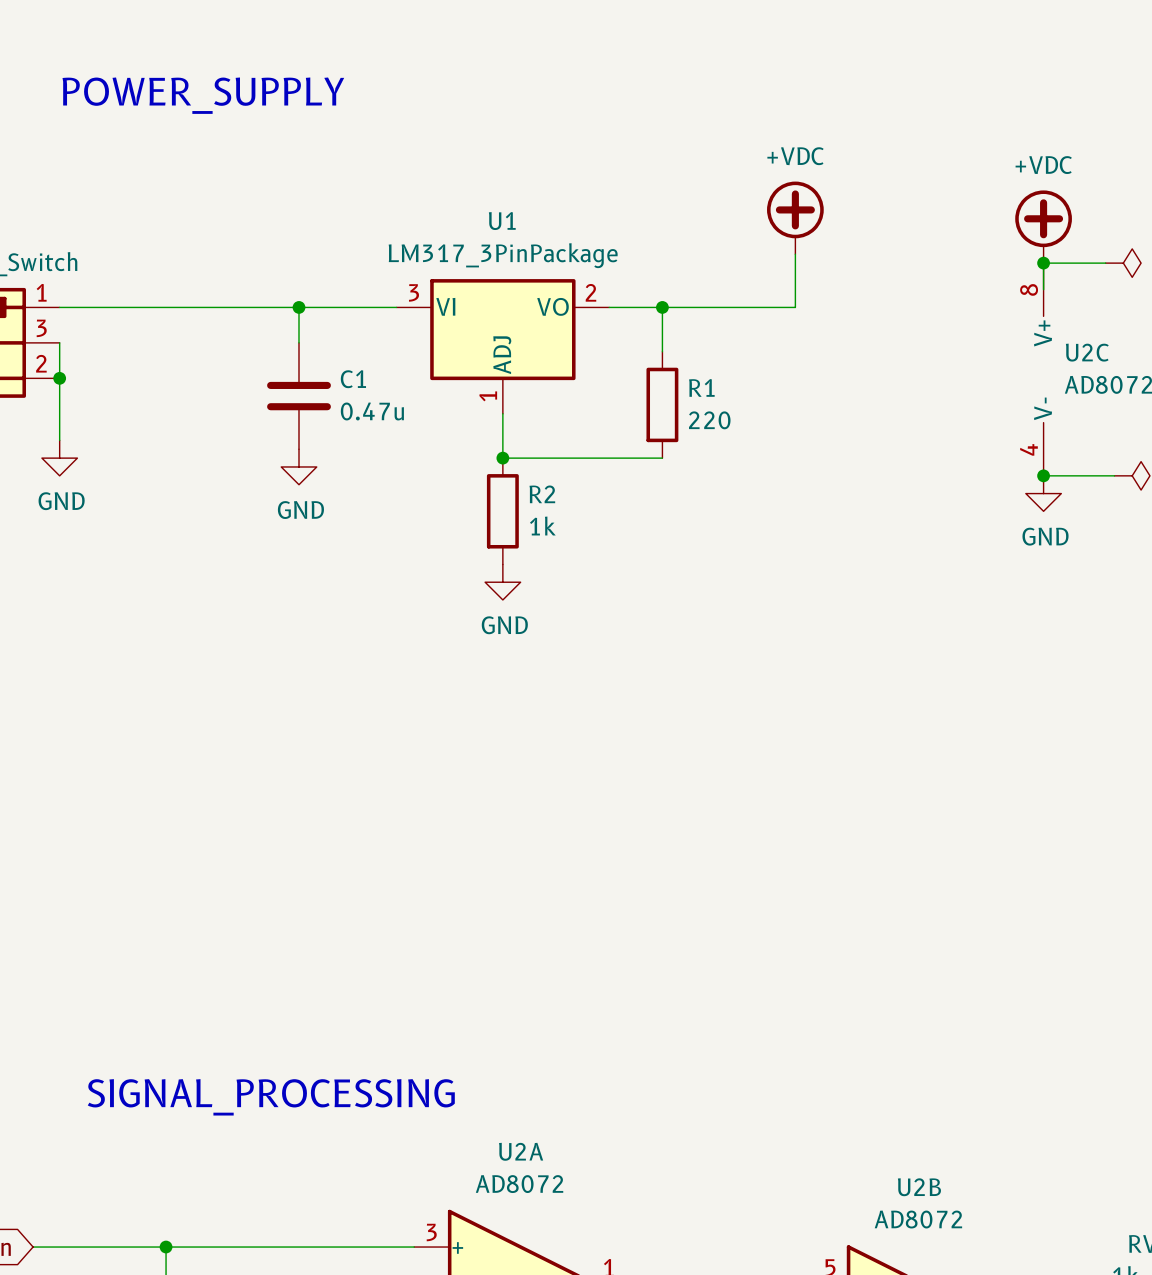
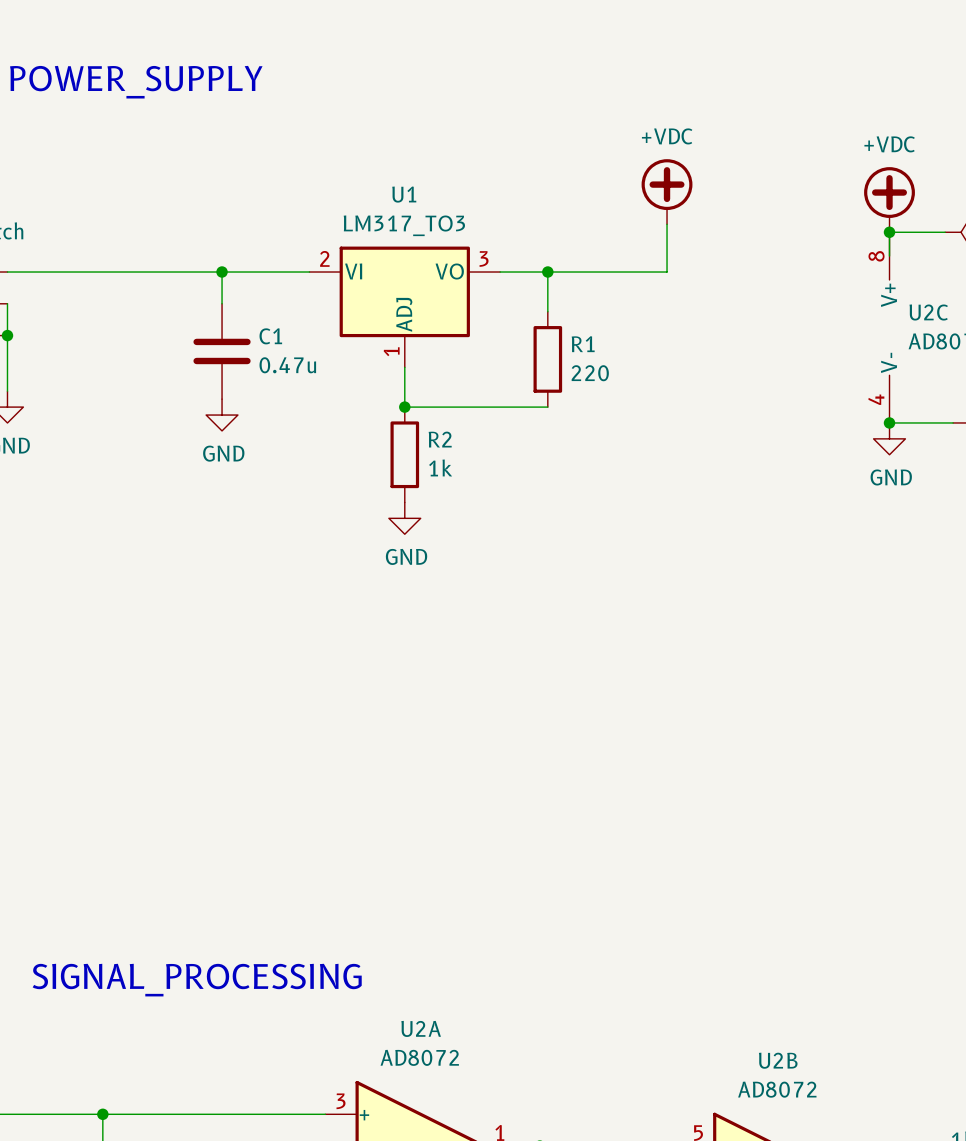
U1 value: LM317_3PinPackage (503, 255) -> LM317_TO3 (404, 225)
U1 pin number: 3 (413, 292) -> 2 (324, 258)
U1 pin number: 2 (590, 292) -> 3 (484, 259)

